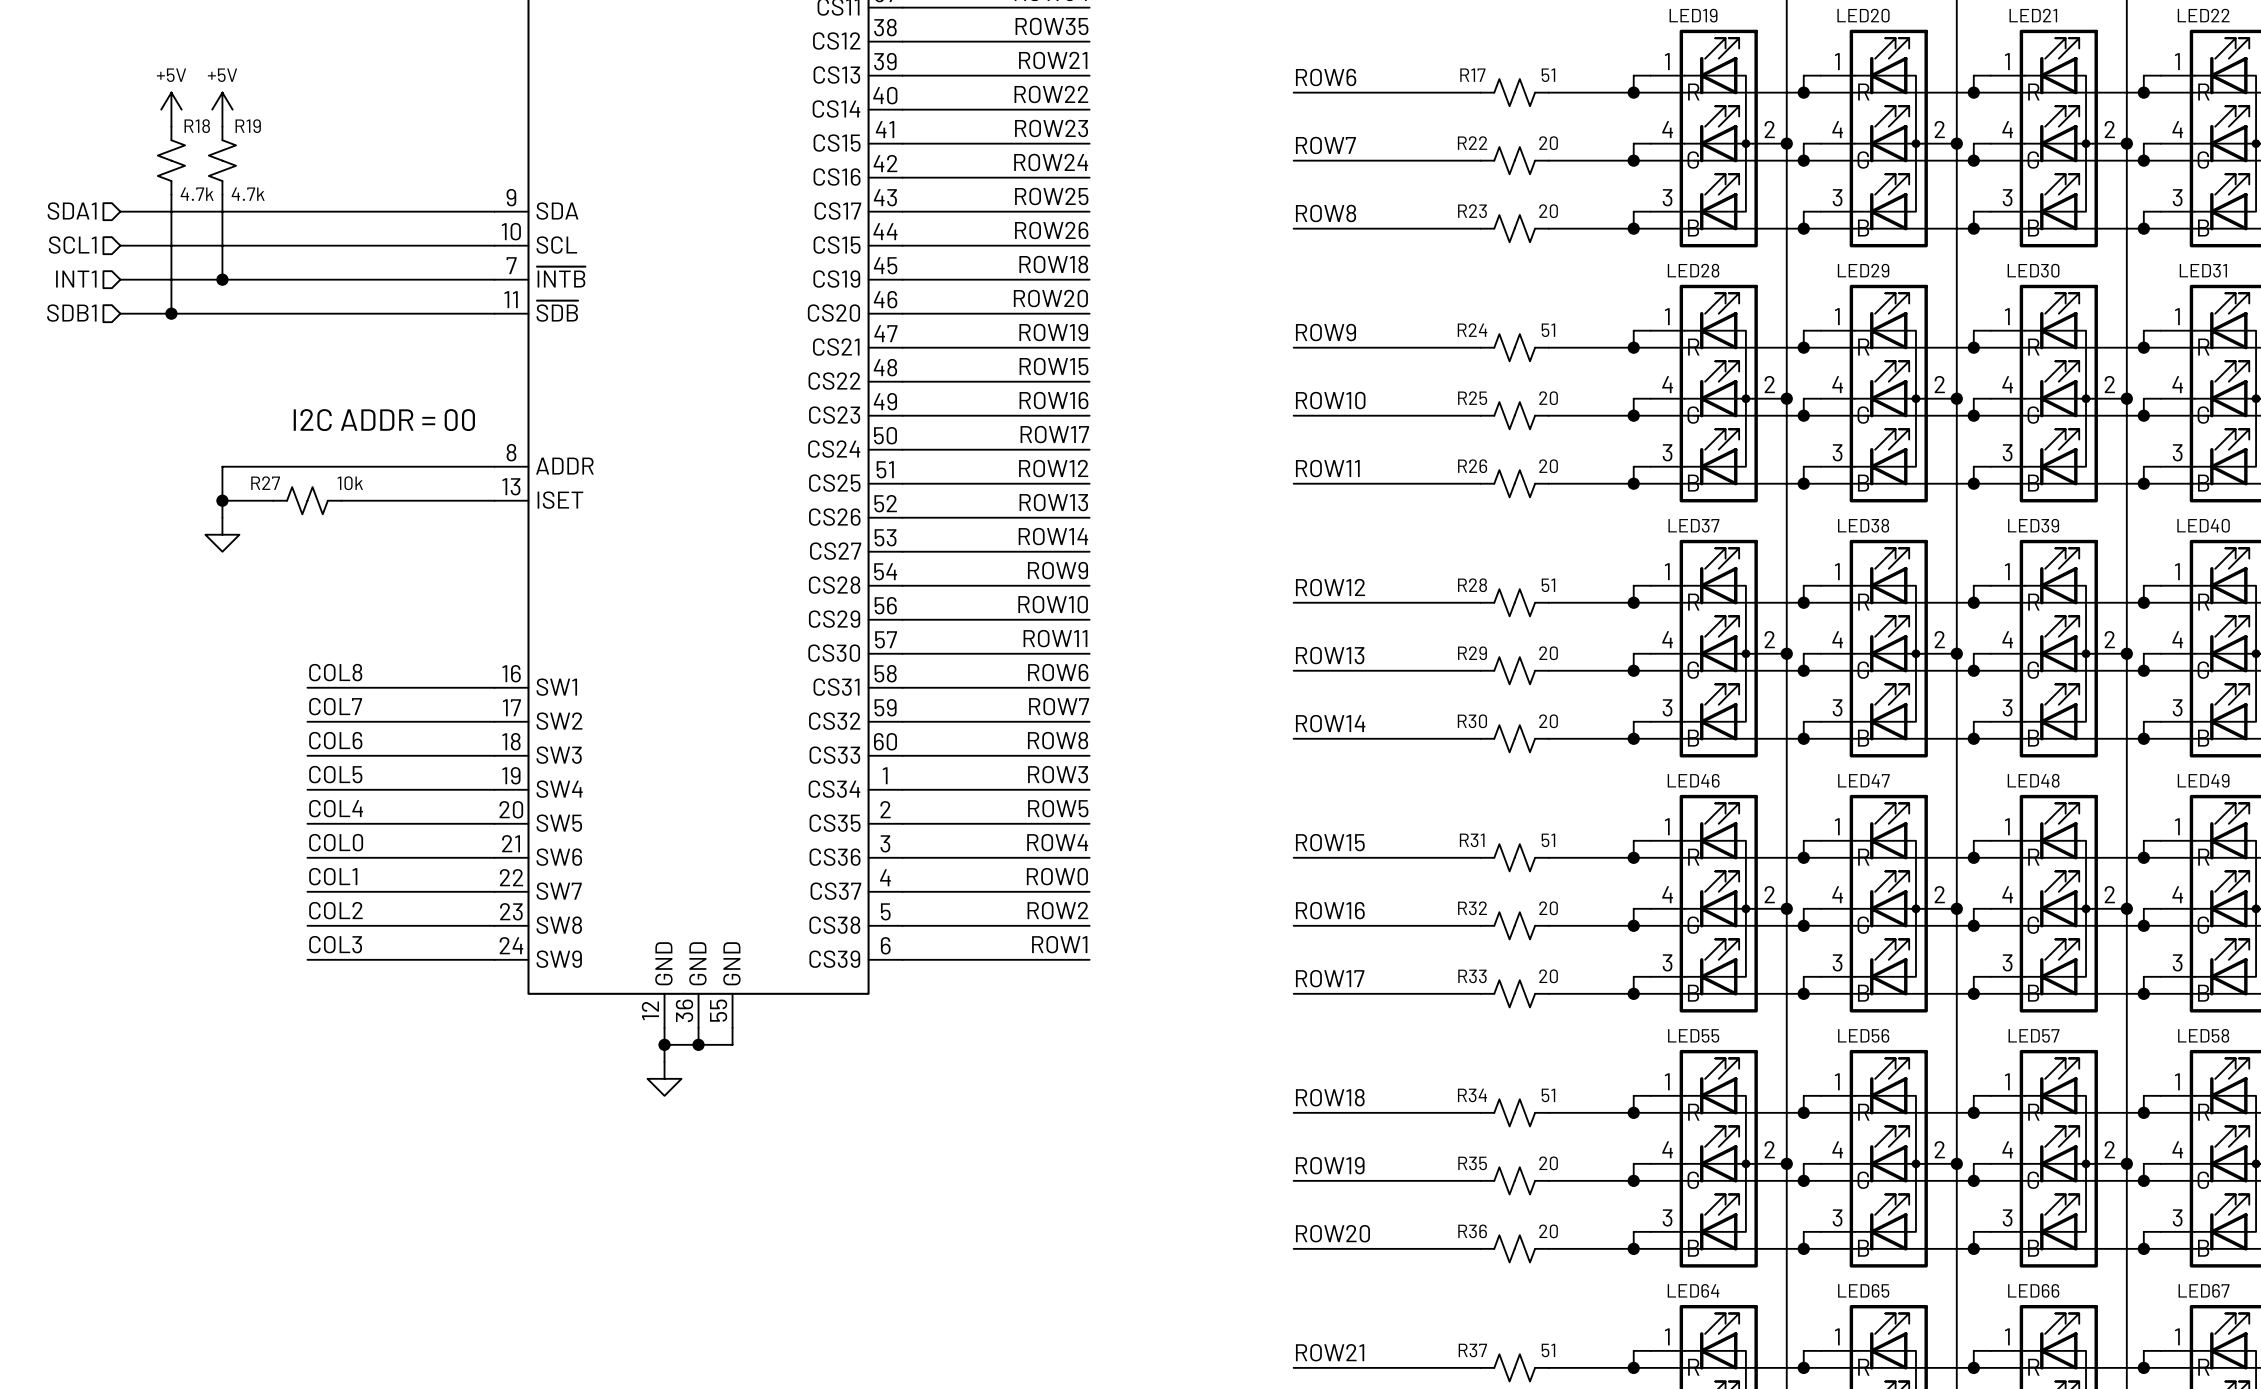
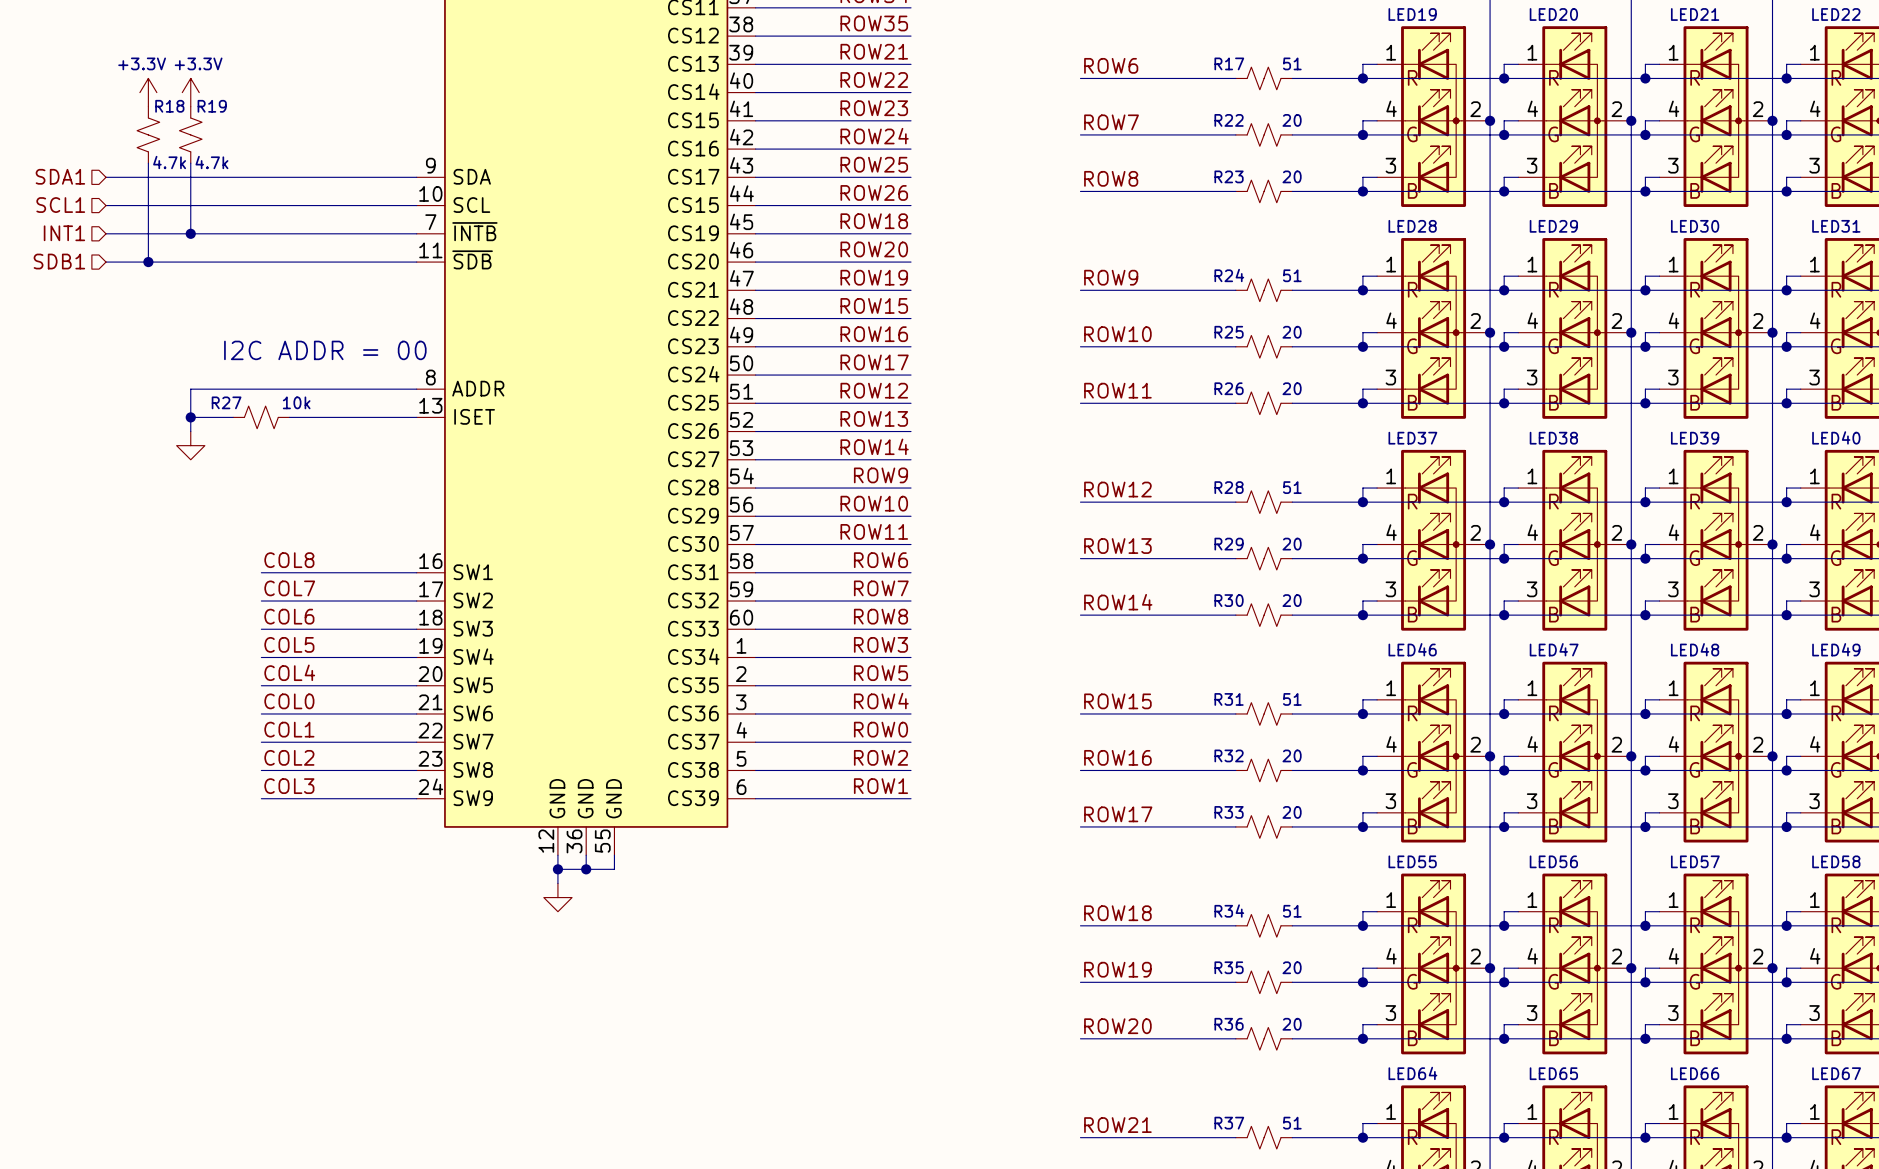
power symbol: +5V (171, 109) -> +3.3V (148, 92)
power symbol: +5V (222, 109) -> +3.3V (190, 92)

